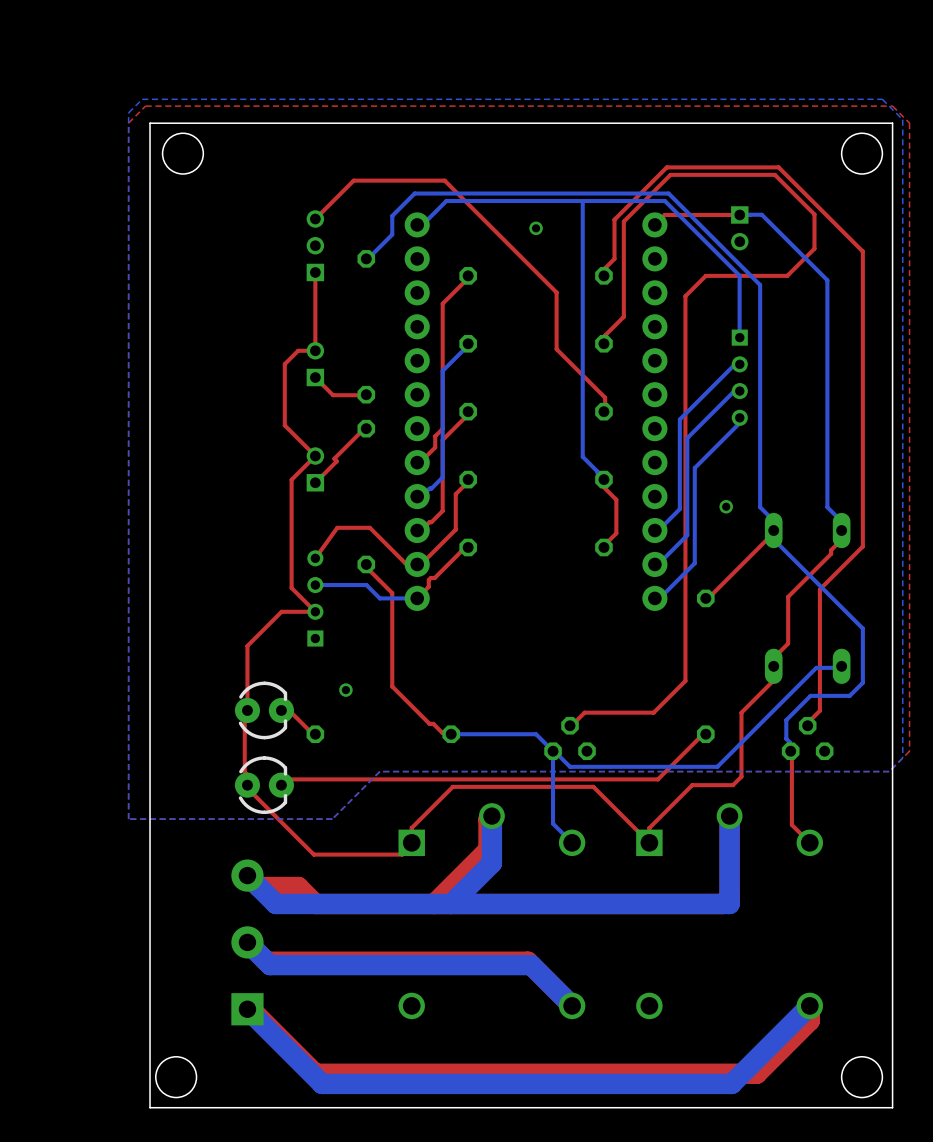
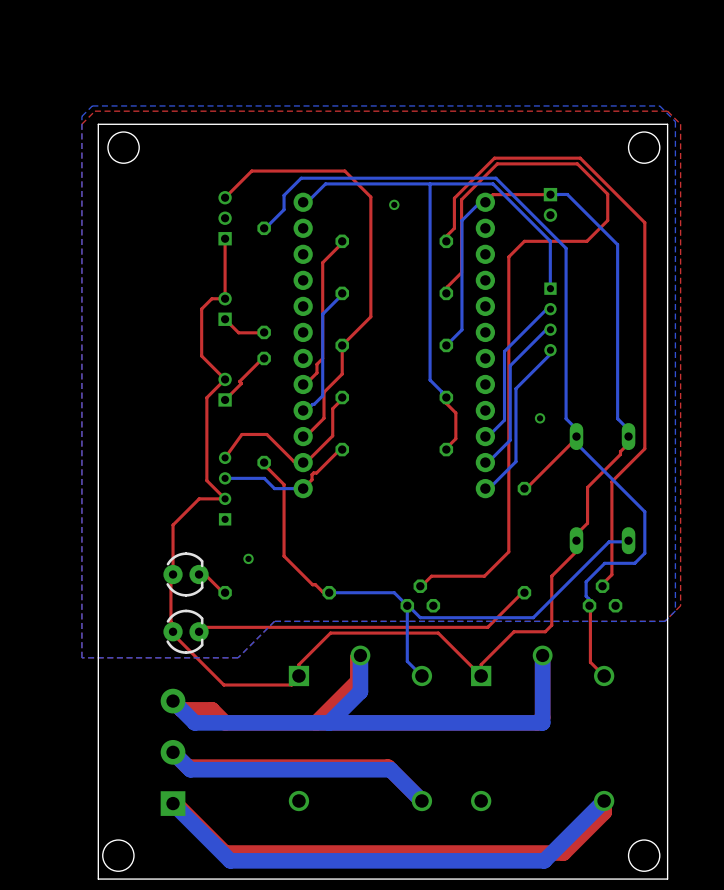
top track: (350, 184) (353, 180) (444, 180) (556, 292) (556, 349) (605, 397) (603, 411) -> (251, 171) (344, 171) (370, 197) (370, 316) (342, 345) (342, 374) (324, 392) (324, 418) (305, 436) (303, 436)
bottom track: none -> (485, 202) (480, 202) (461, 220) (461, 329) (446, 345)
top track: (468, 411) (466, 415) (442, 440) (442, 510) (422, 529) (417, 530) -> none

